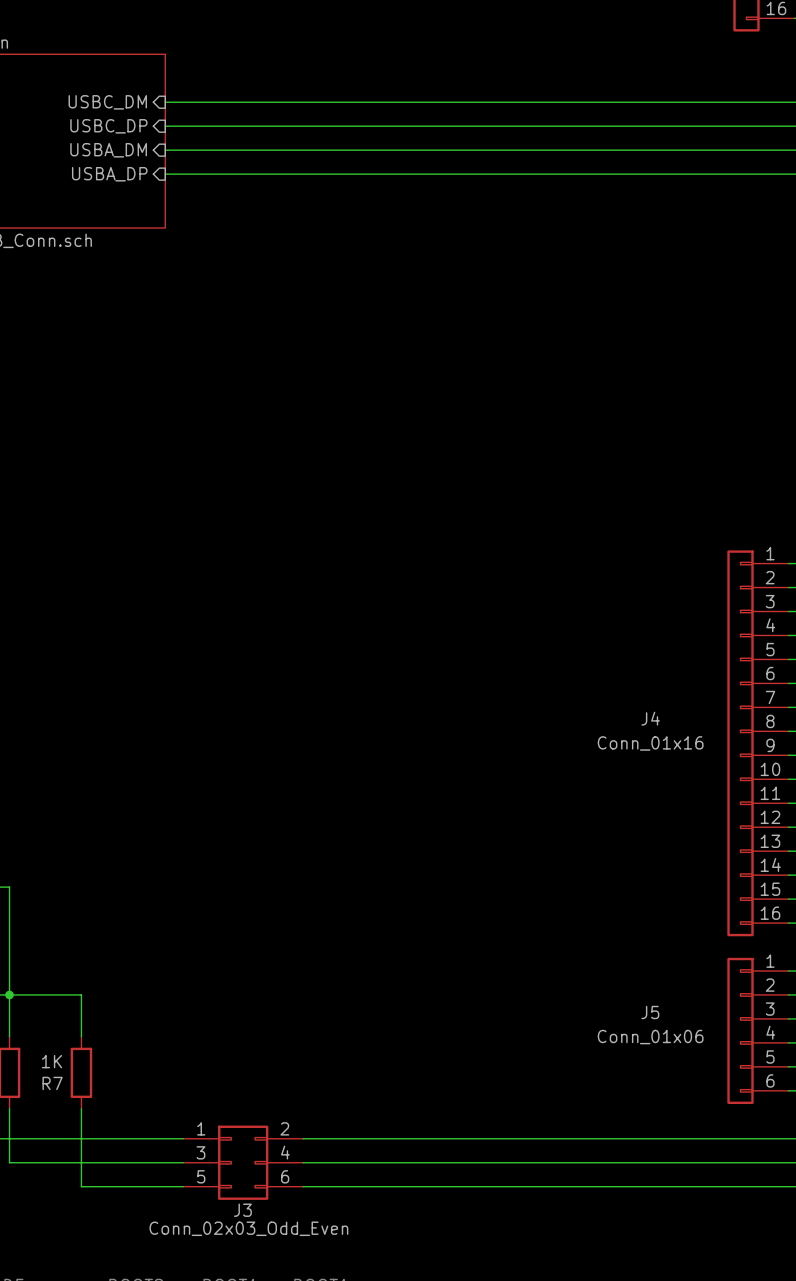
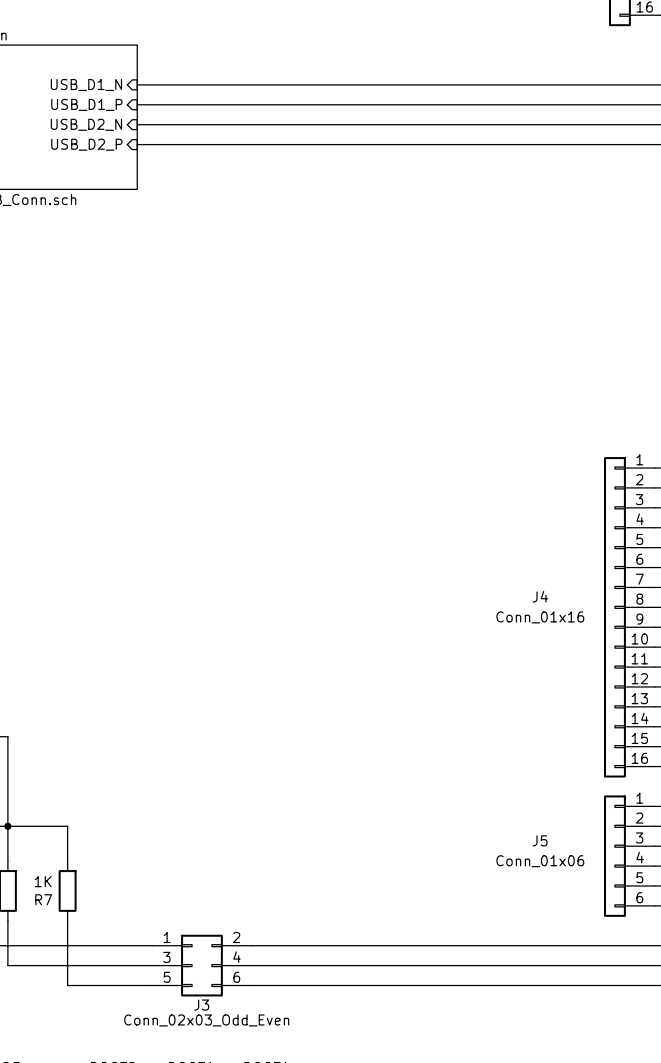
sheet pin: USBC_DM (107, 102) -> USB_D1_N (86, 84)
sheet pin: USBC_DP (108, 126) -> USB_D1_P (86, 104)
sheet pin: USBA_DM (108, 150) -> USB_D2_N (86, 124)
sheet pin: USBA_DP (109, 174) -> USB_D2_P (86, 144)

